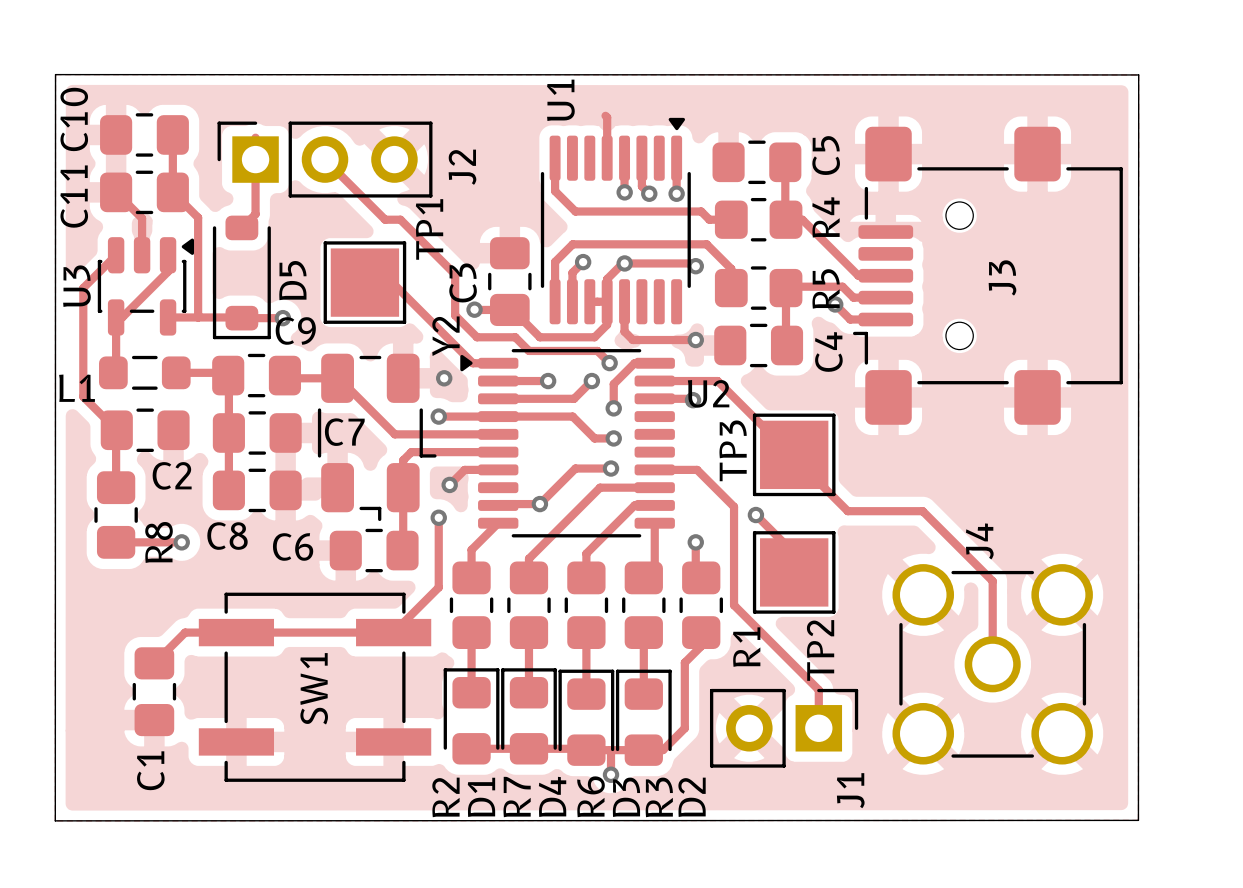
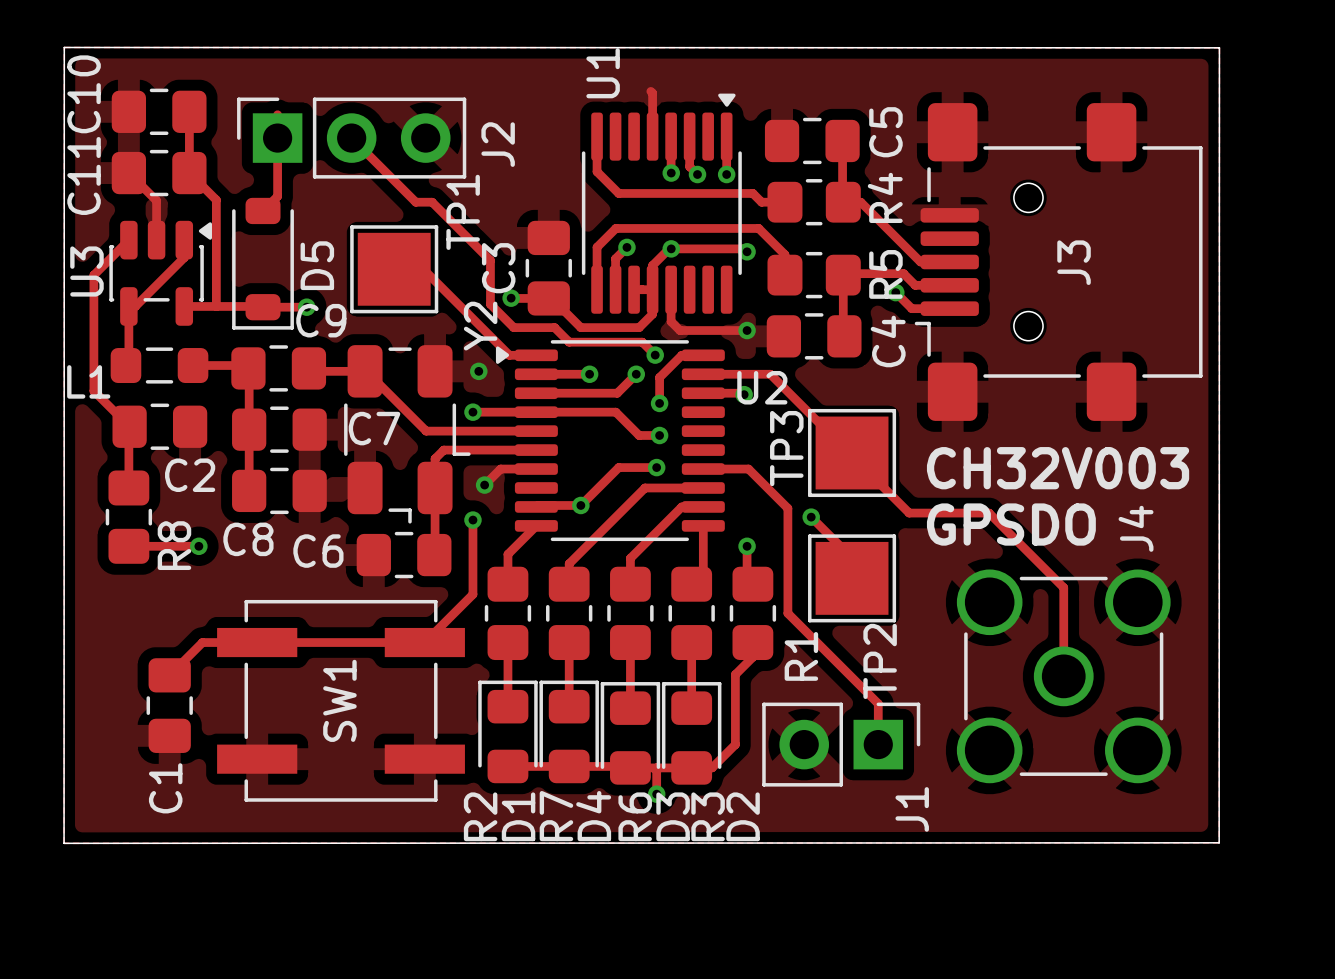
text: none -> CH32V003 (1058, 468)
text: none -> GPSDO (1011, 524)
J4 name position: J4 (979, 541) -> J4 (1136, 528)

